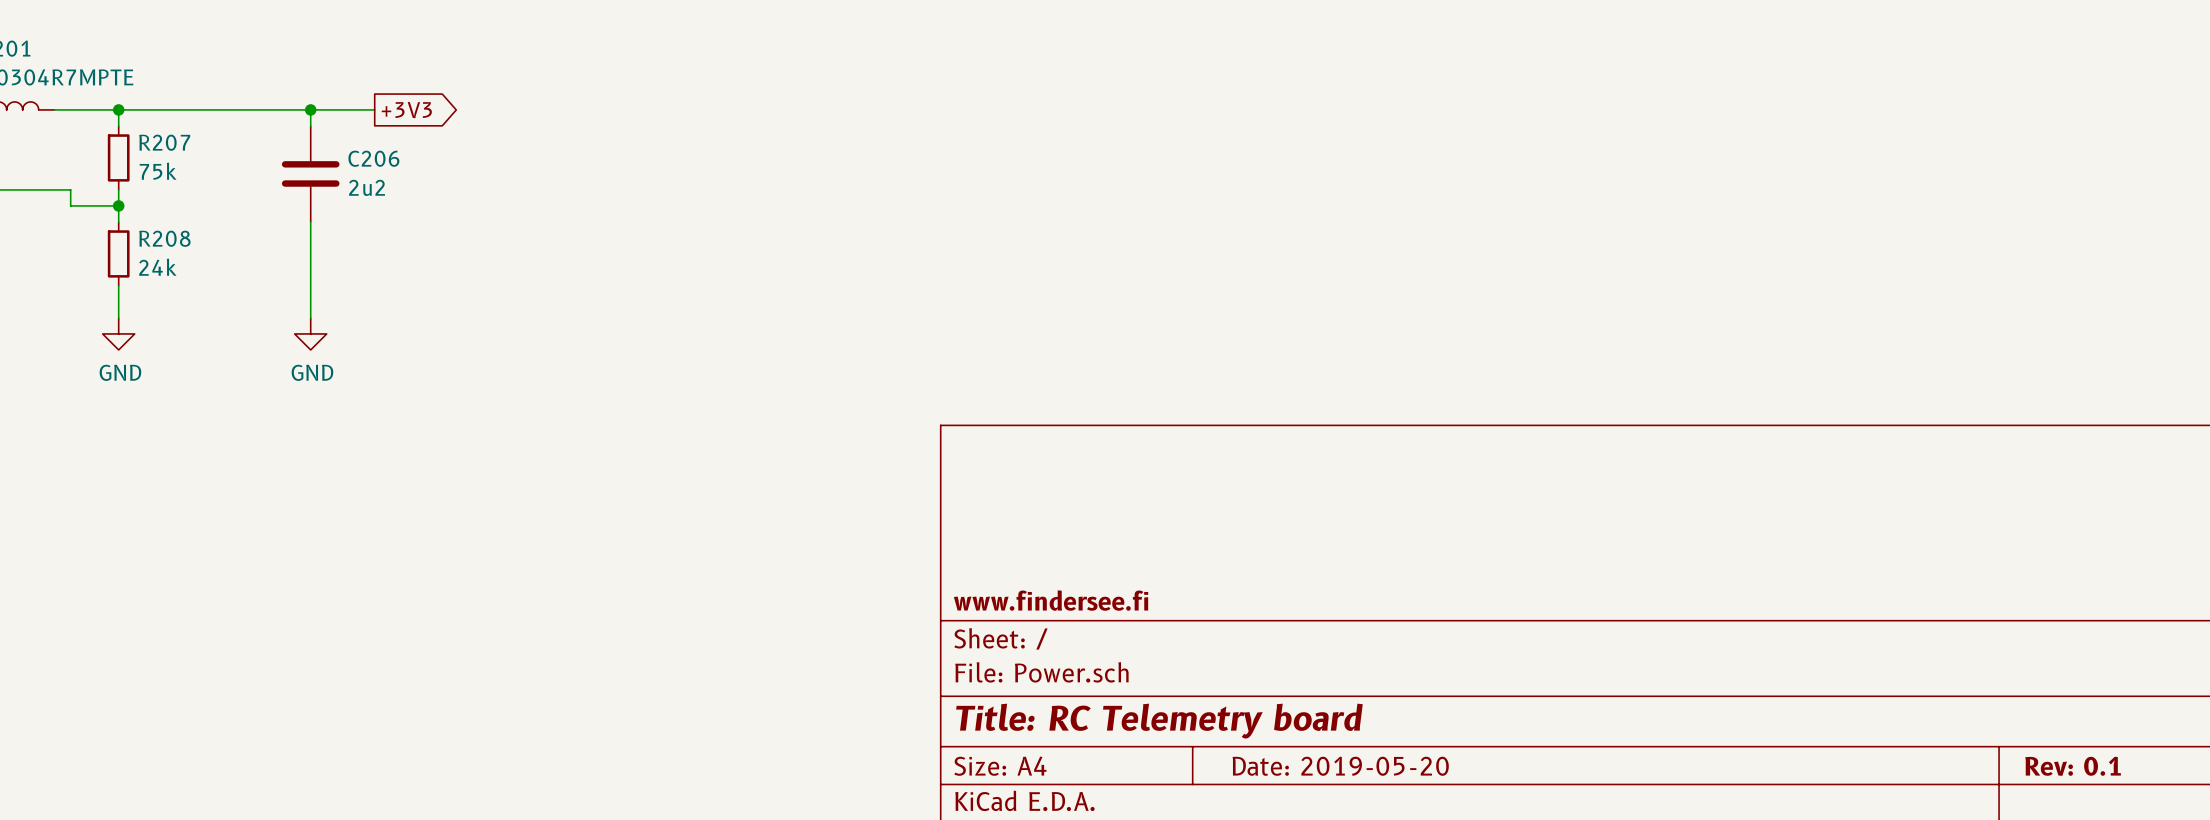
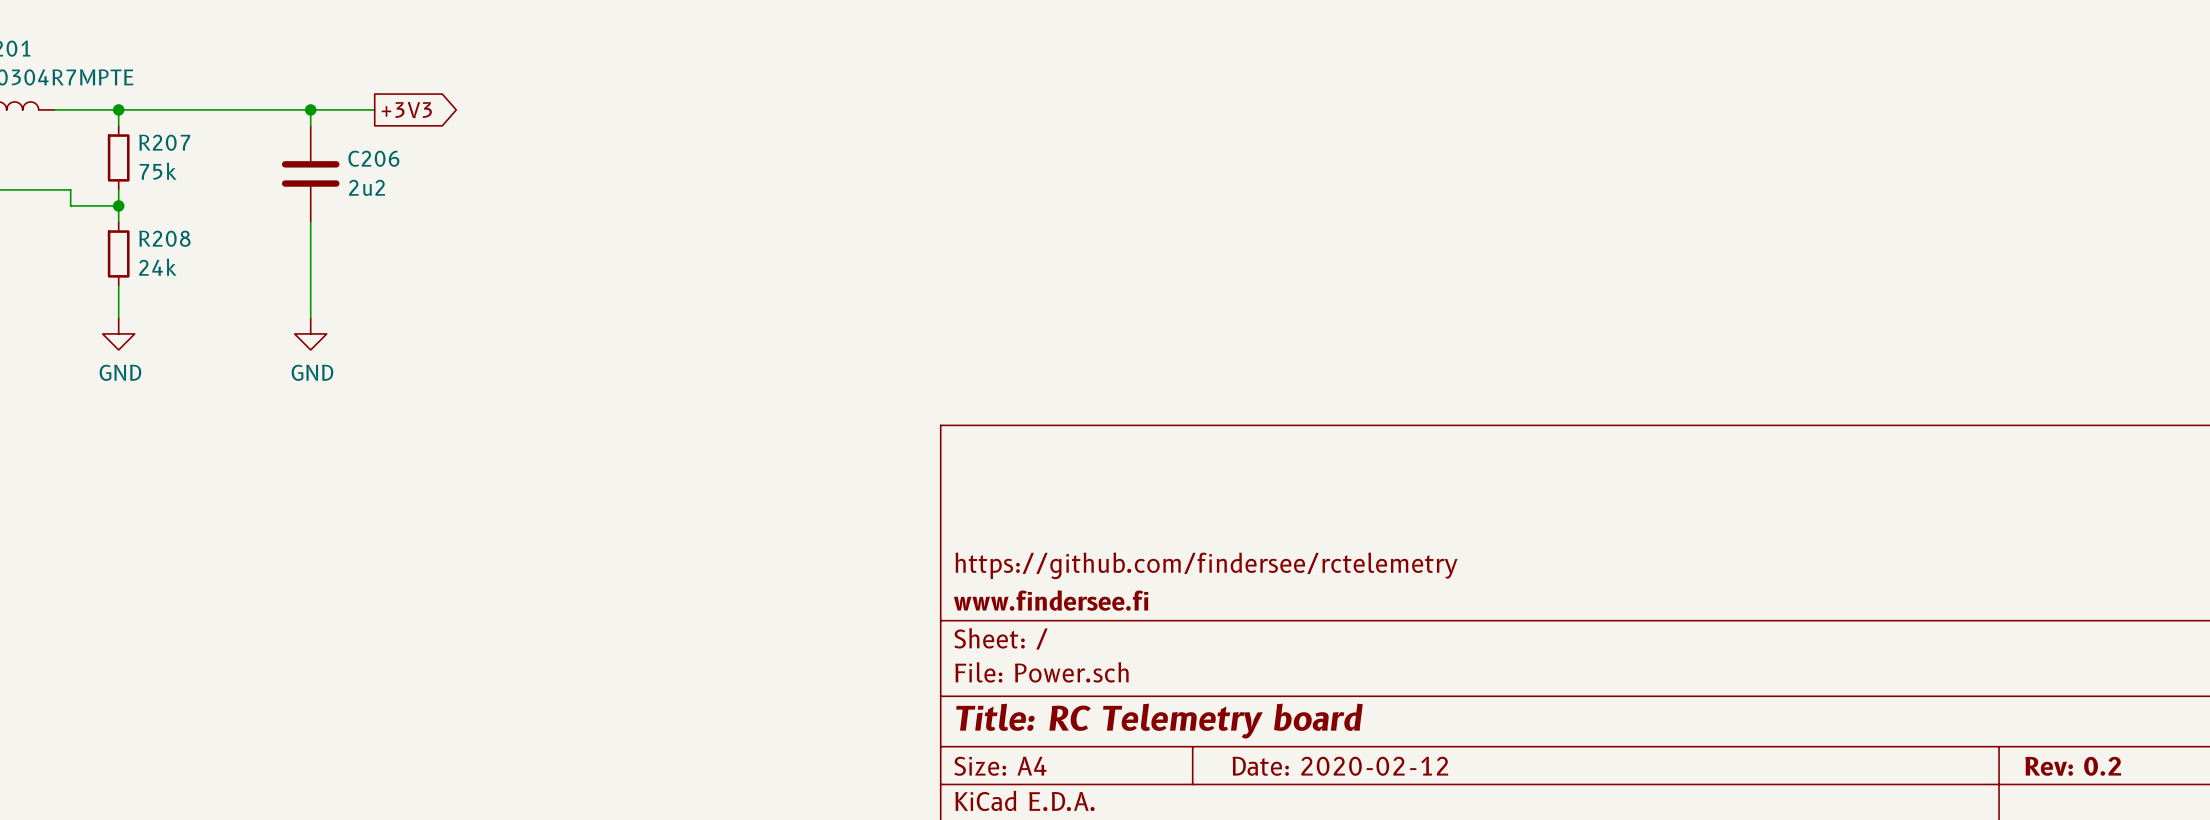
title block: none -> https://github.com/findersee/rctelemetry (1206, 565)
title block: Date: 2019-05-20 (1340, 766) -> Date: 2020-02-12 (1340, 766)
title block: Rev: 0.1 (2073, 766) -> Rev: 0.2 (2073, 766)

